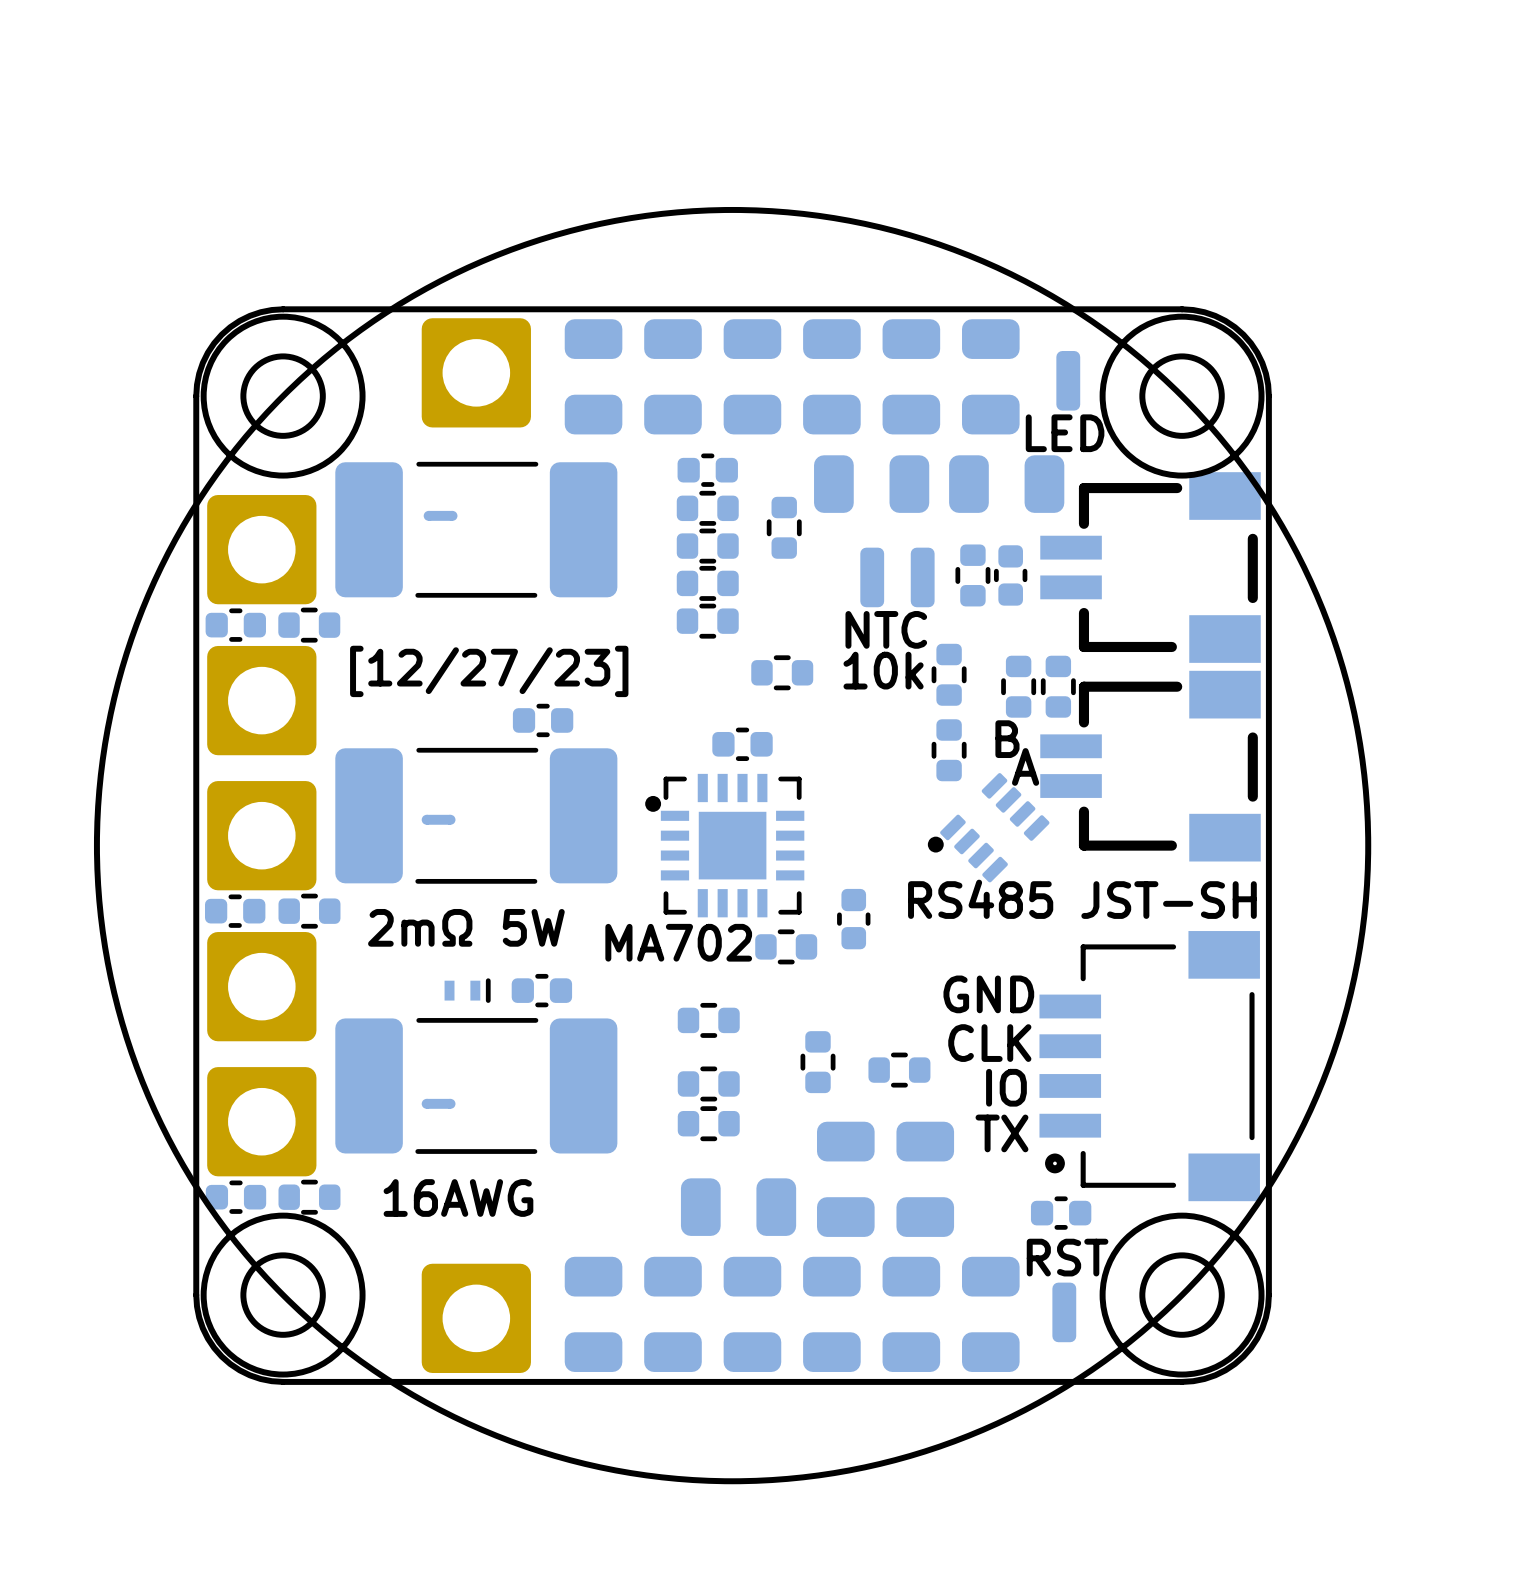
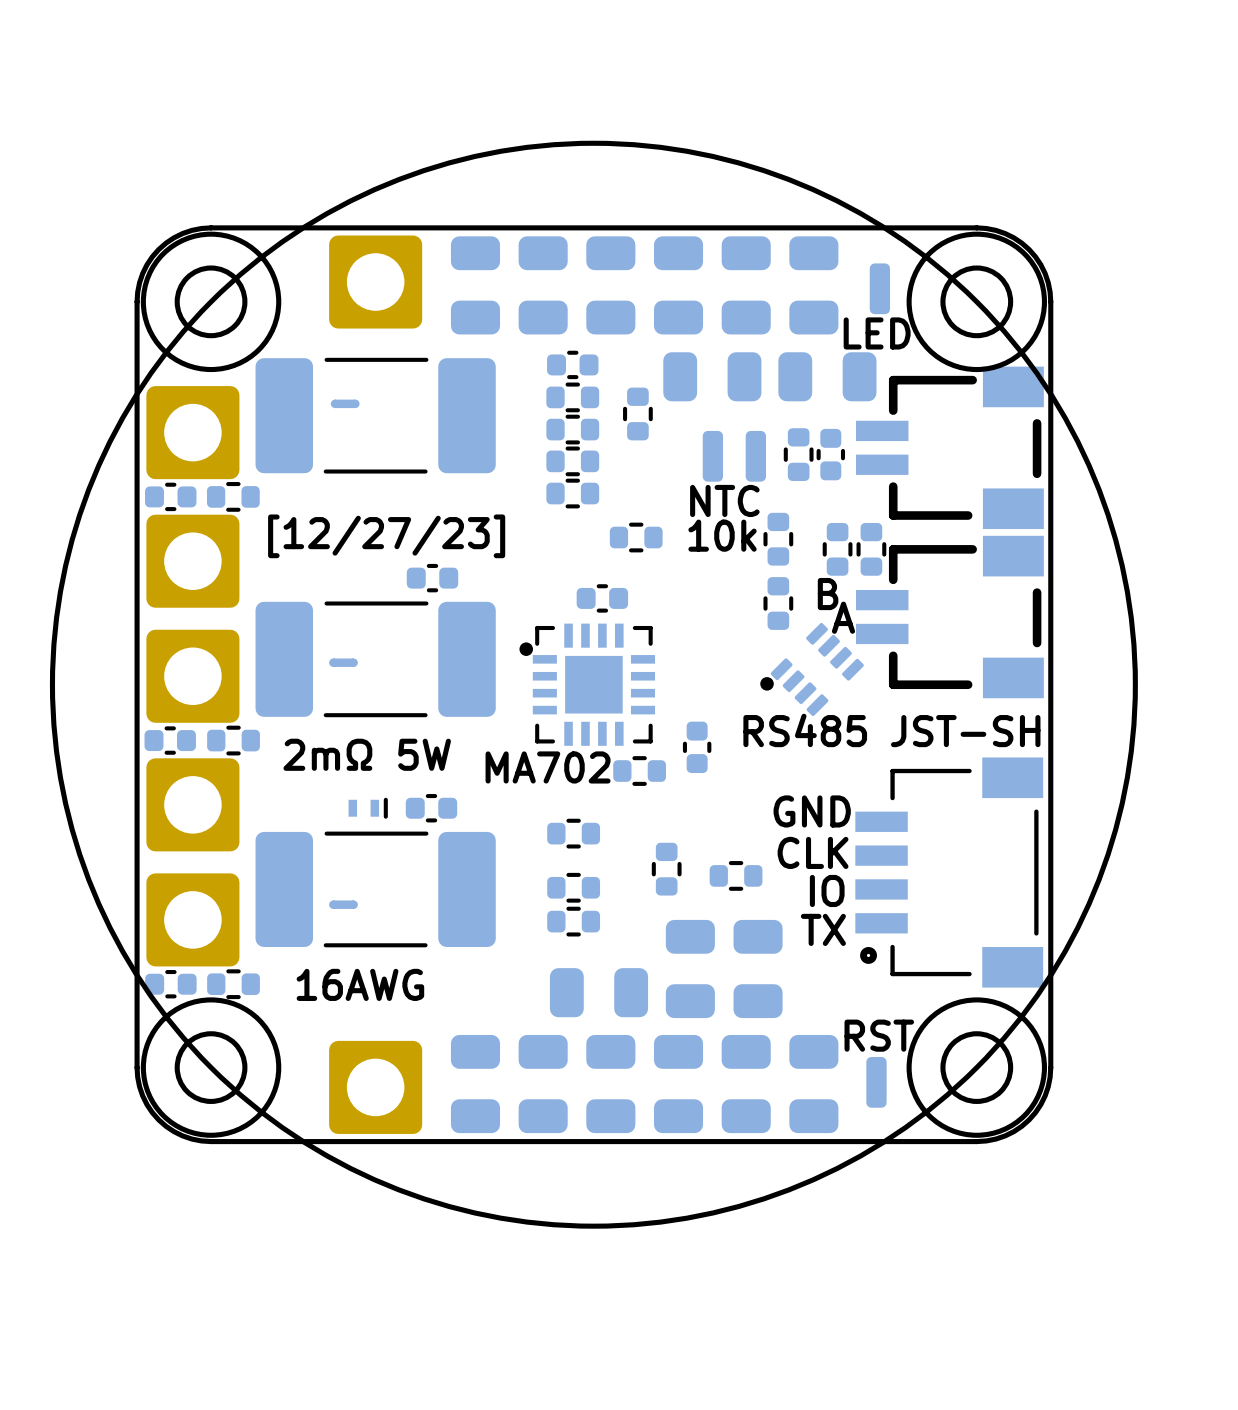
part: (1061, 1213) -> none

